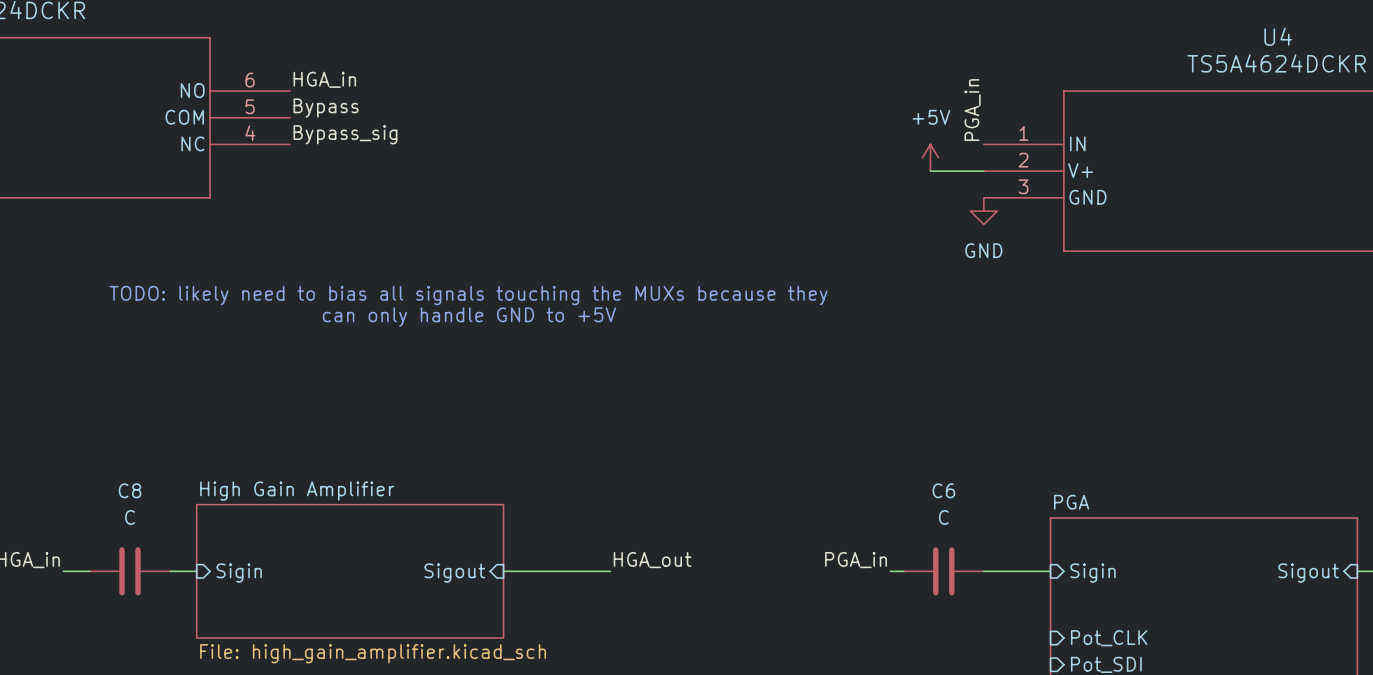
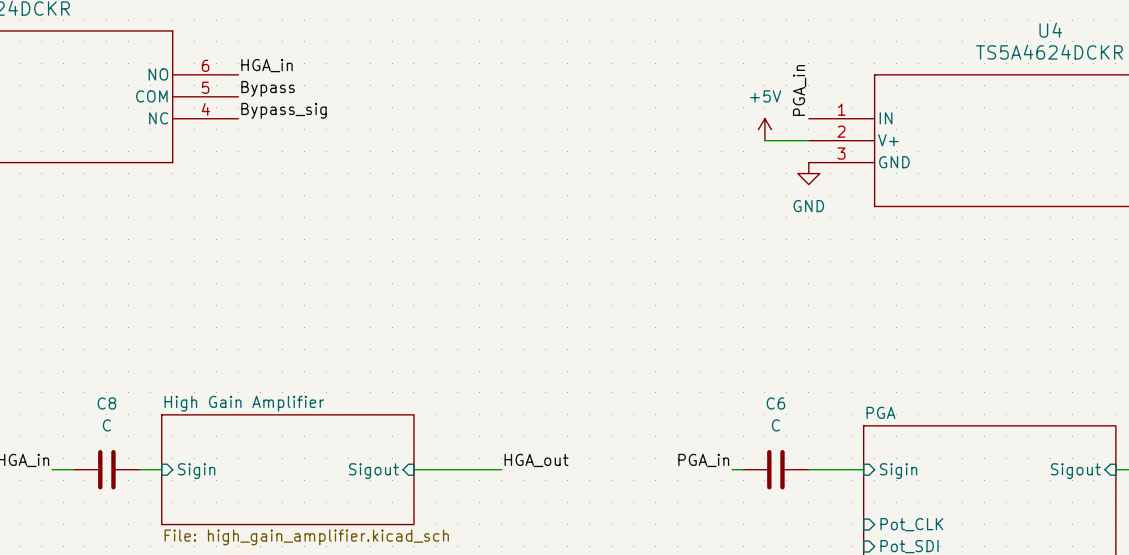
text: TODO: likely need to bias all signals touching the MUXs because they (468, 295) -> none
text: can only handle GND to +5V (469, 317) -> none

